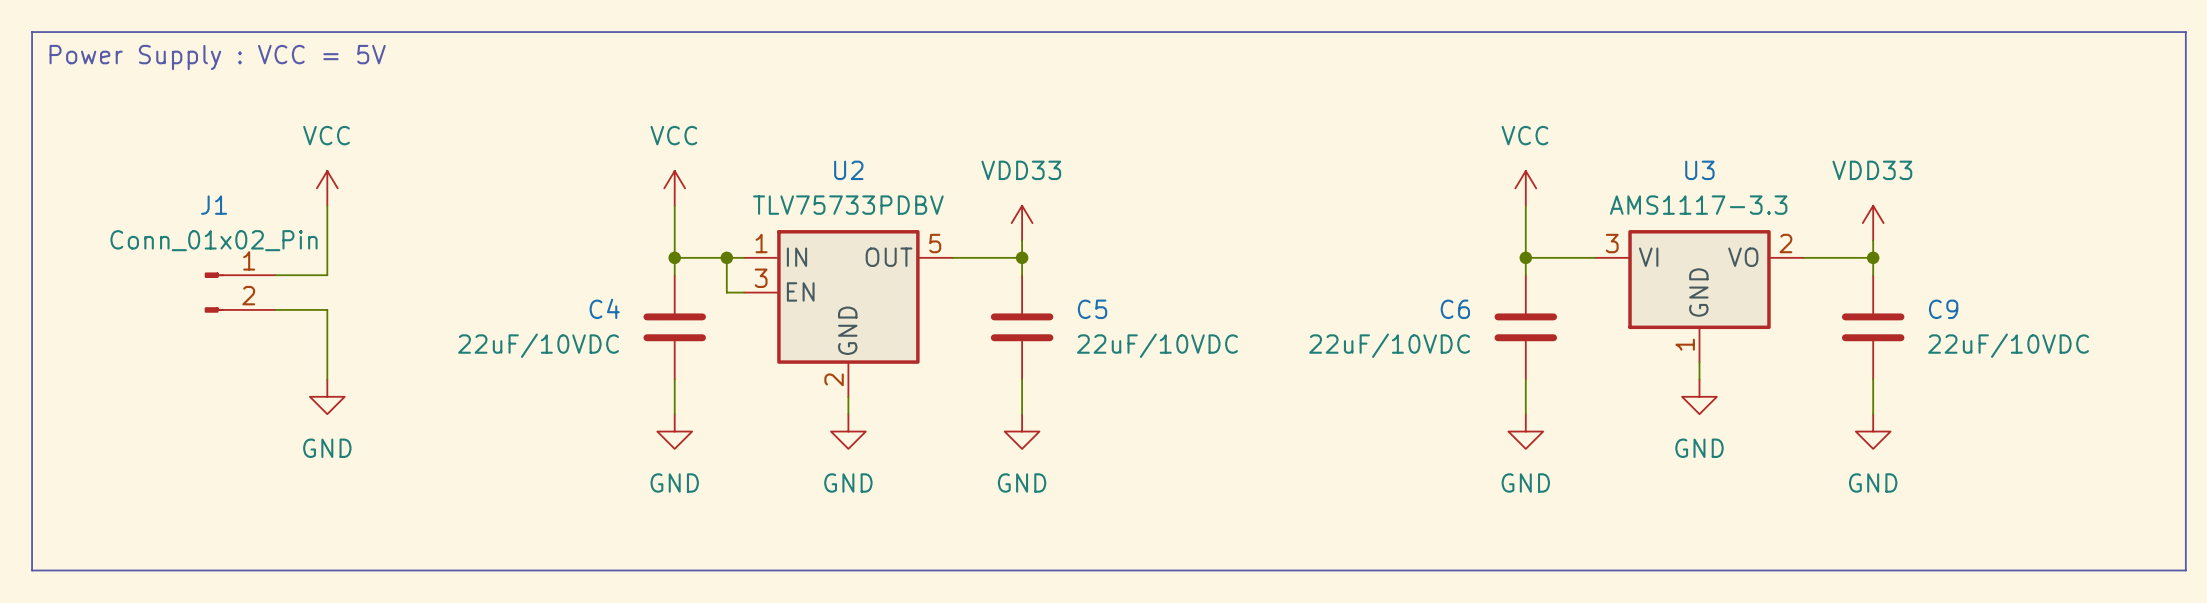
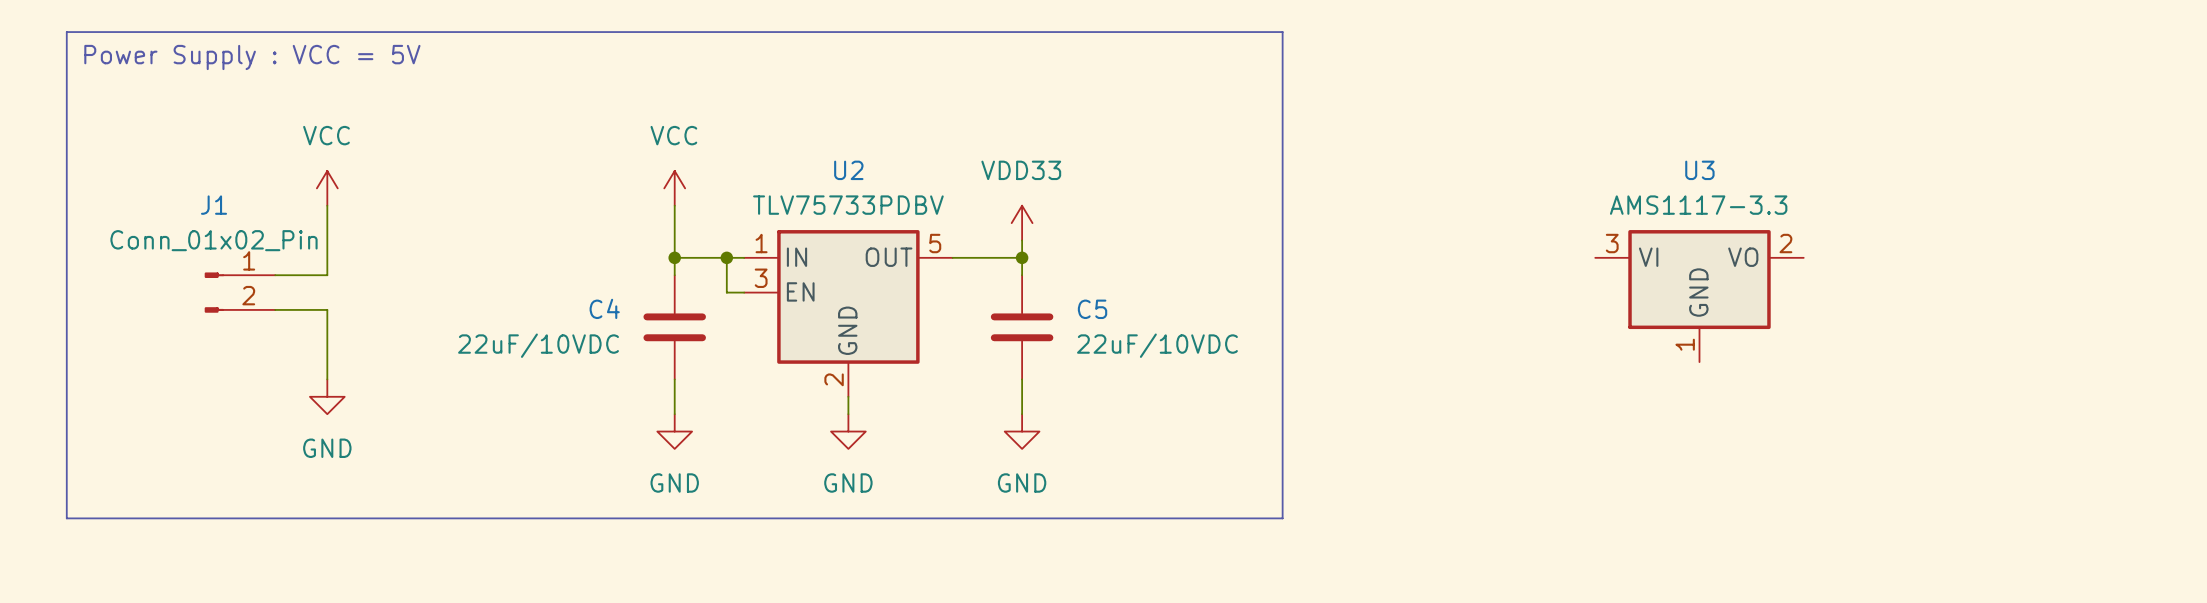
line: (66, 32) (32, 32) (32, 570) (2185, 570) (2185, 32) (1282, 32) -> (66, 32) (66, 518) (1282, 518) (1282, 32)
text position: Power Supply : VCC = 5V (217, 57) -> Power Supply : VCC = 5V (252, 57)
power symbol: VCC (1525, 188) -> none
wire: (1525, 205) (1525, 275) -> none
power symbol: VDD33 (1873, 223) -> none
wire: (1873, 240) (1873, 275) -> none
wire: (1525, 257) (1595, 257) -> none
junction: (1525, 257) -> none
wire: (1803, 257) (1873, 257) -> none
junction: (1873, 257) -> none
C6: 22uF/10VDC (1525, 327) -> none
C9: 22uF/10VDC (1873, 327) -> none
wire: (1699, 362) (1699, 379) -> none
wire: (1525, 379) (1525, 414) -> none
wire: (1873, 379) (1873, 414) -> none
power symbol: GND (1699, 396) -> none
power symbol: GND (1525, 431) -> none
power symbol: GND (1873, 431) -> none

